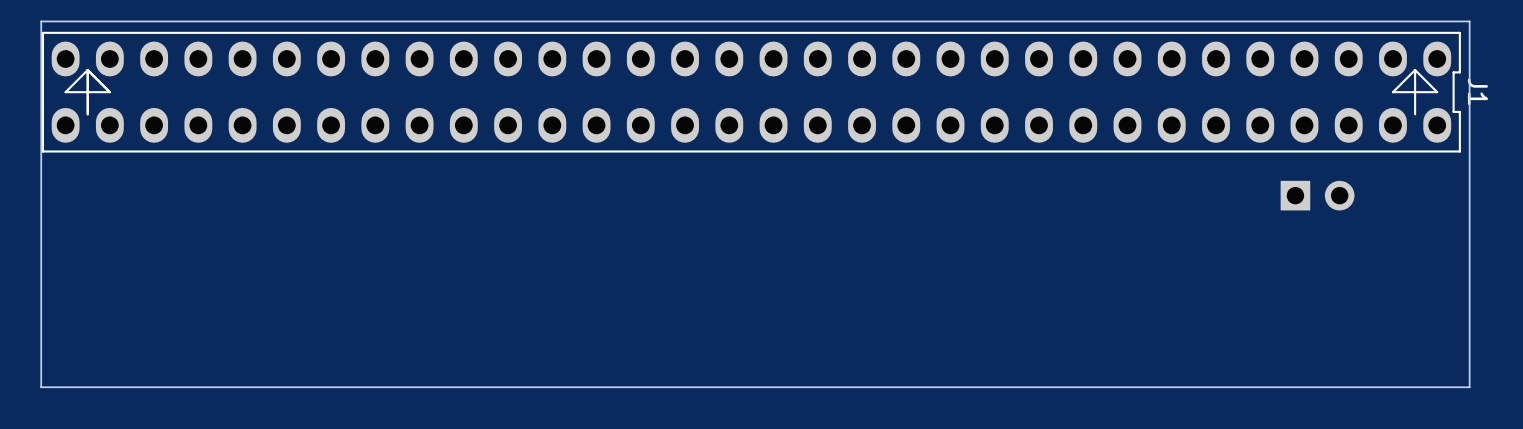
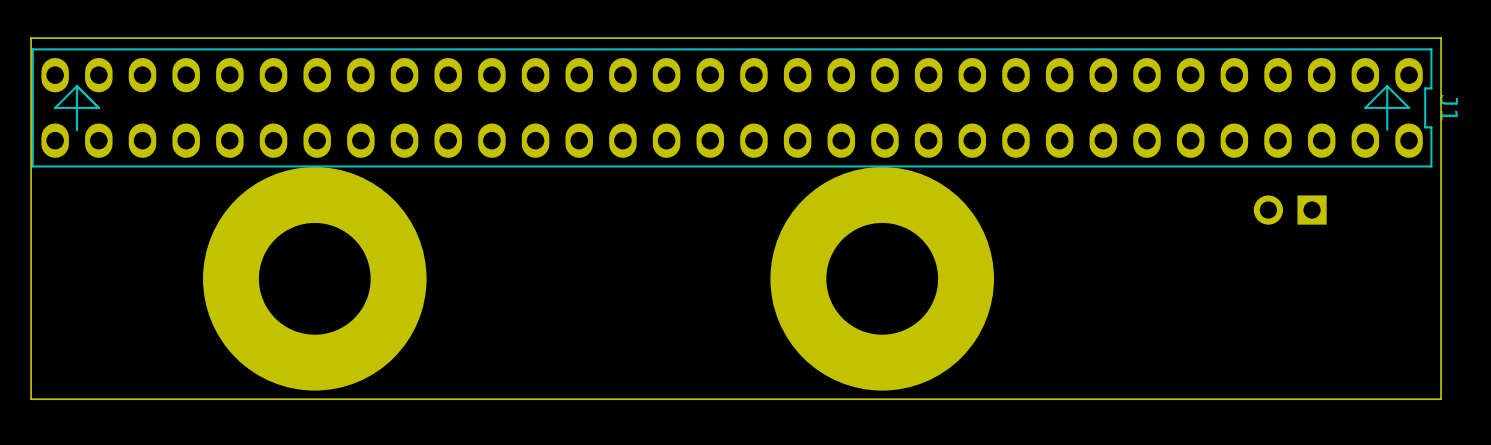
part rotation: 0° (1317, 195) -> 180° (1290, 210)
part: none -> (314, 278)
part: none -> (882, 278)

